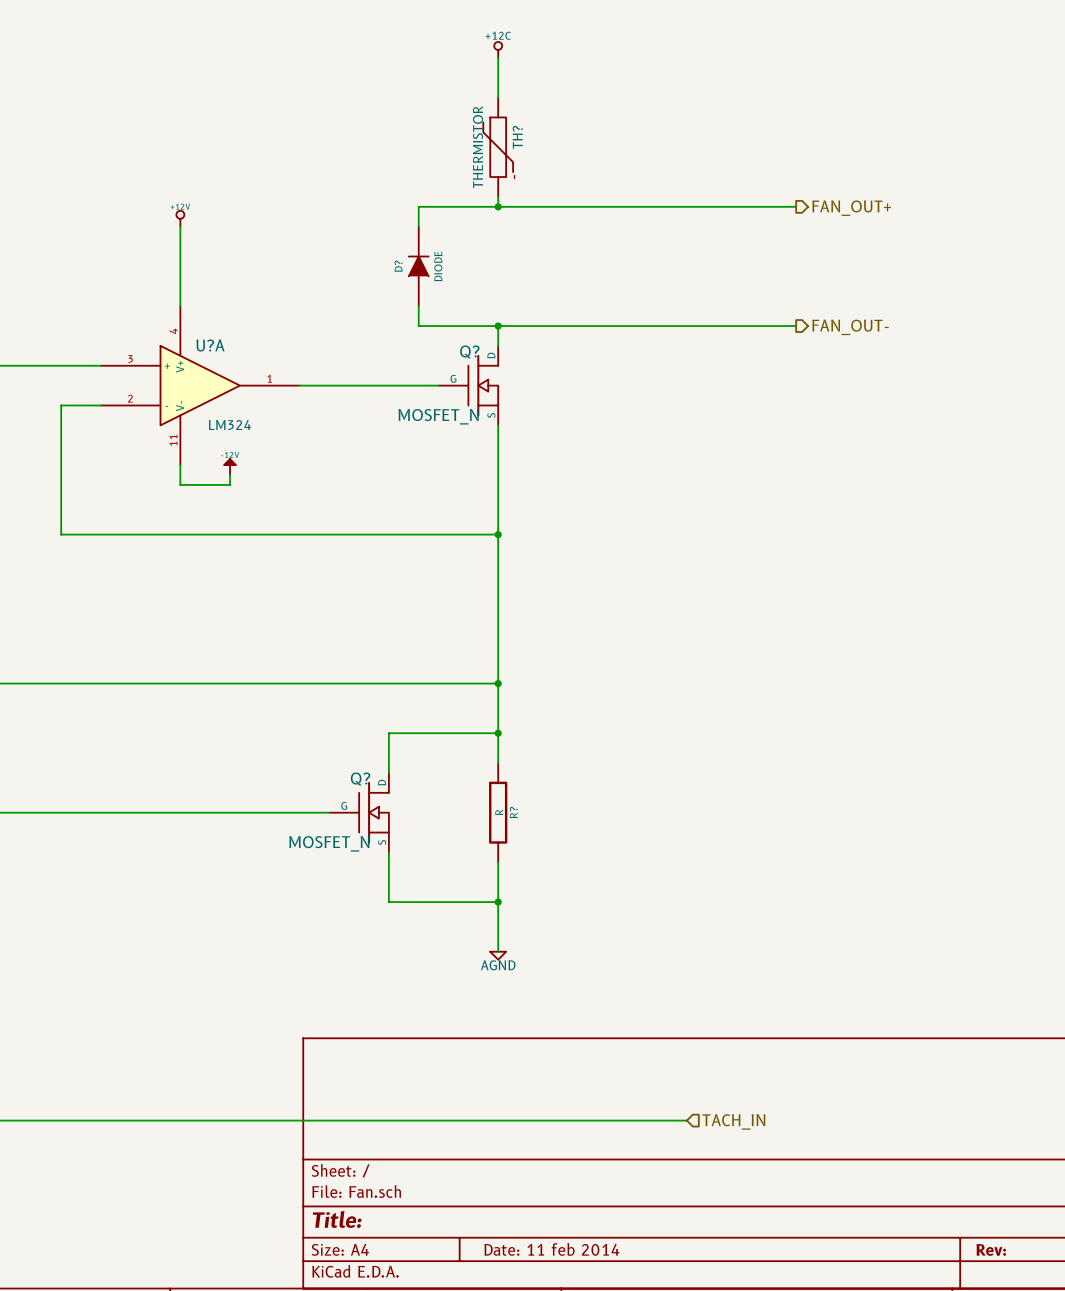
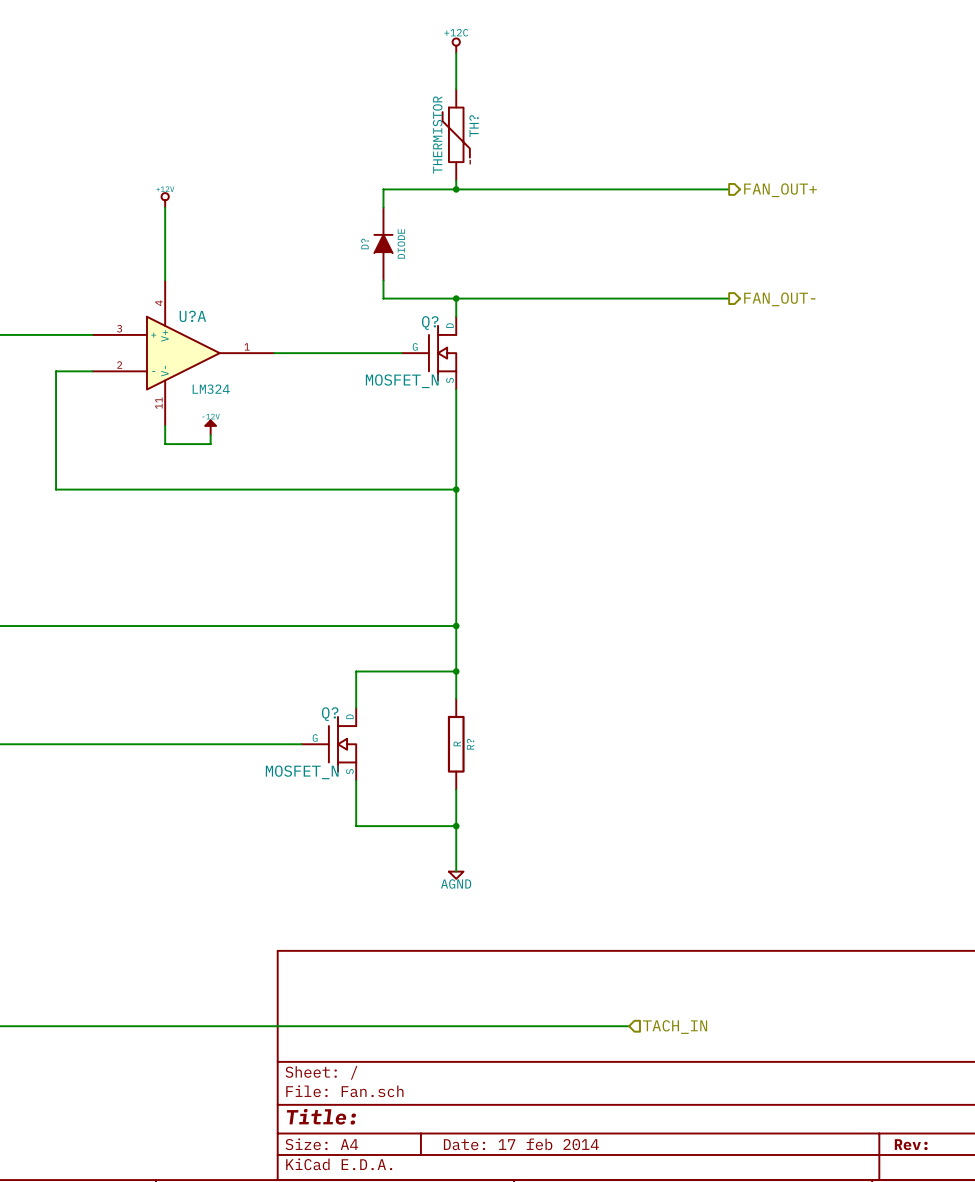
title block: Date: 11 feb 2014 (551, 1249) -> Date: 17 feb 2014 (521, 1144)

